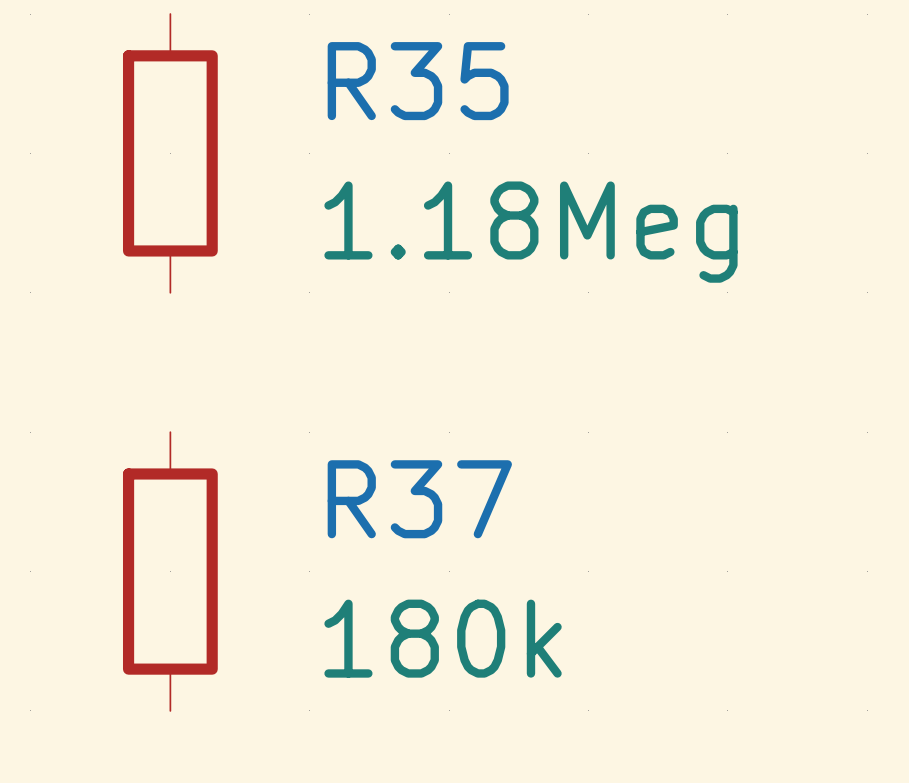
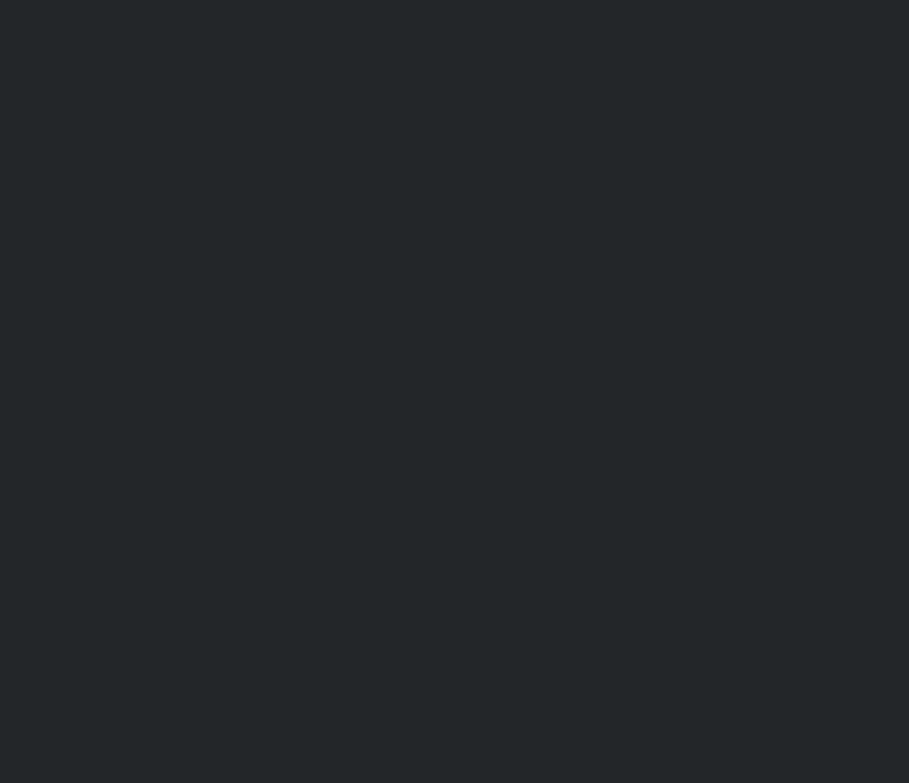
R35: 1.18Meg (170, 153) -> none
R37: 180k (170, 571) -> none

